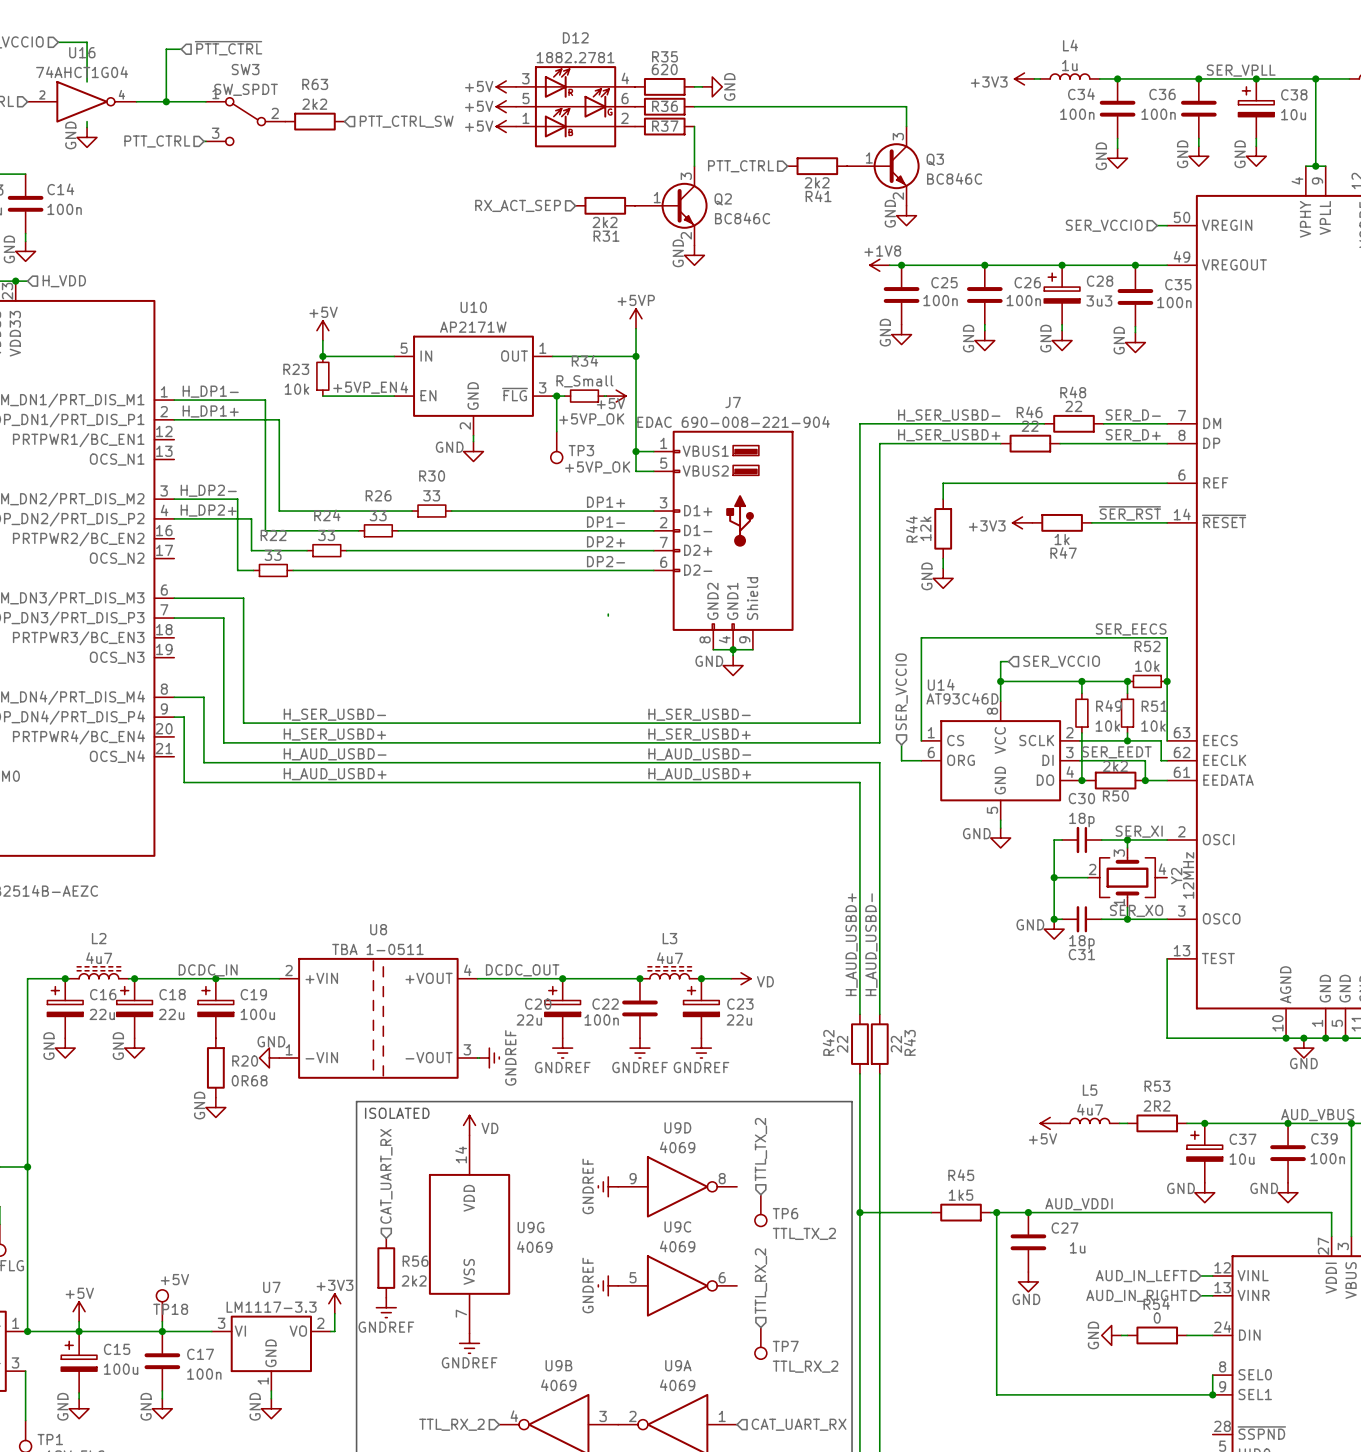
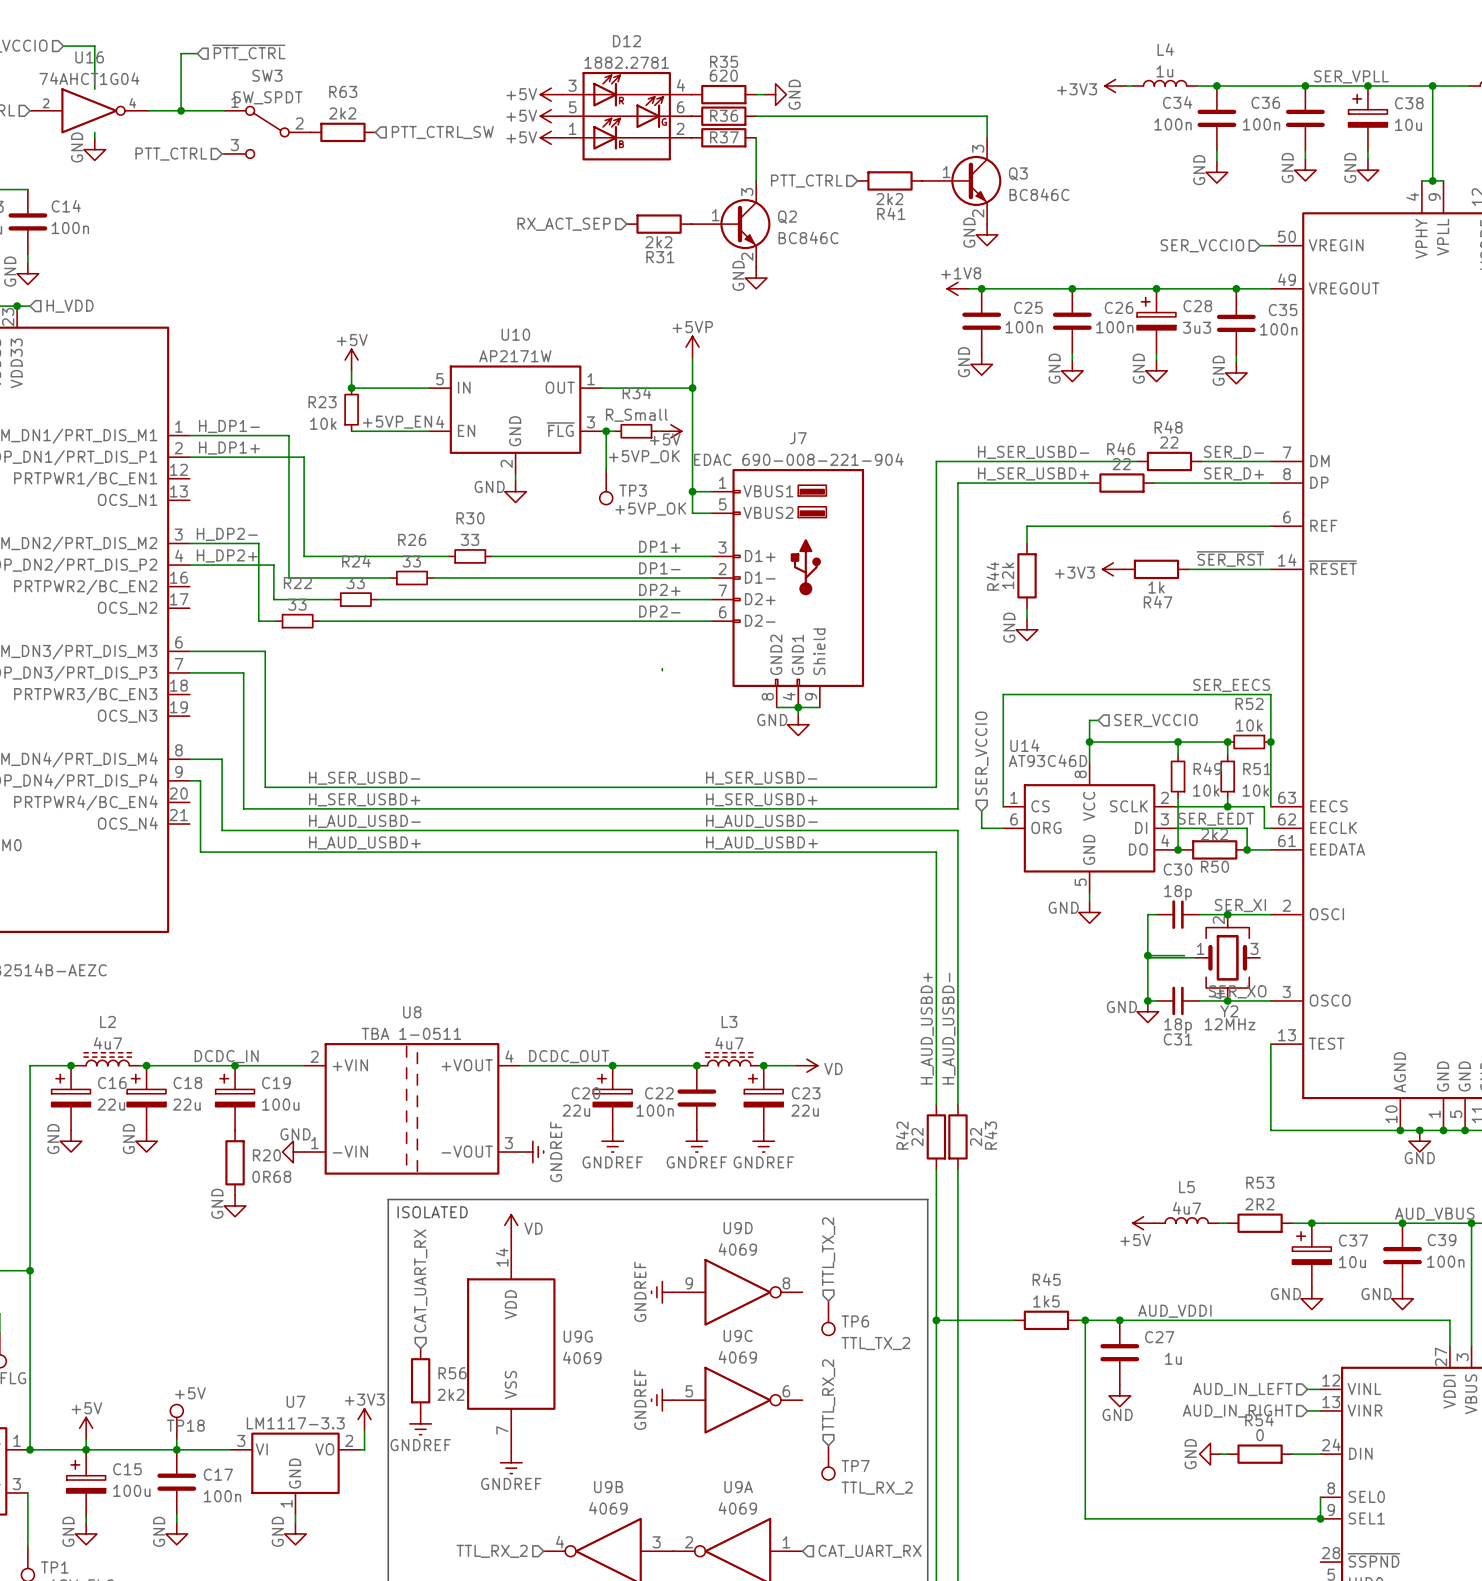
Y2 rotation: 0° (1127, 877) -> 90° clockwise (1227, 957)
wire: none -> (1147, 957) (1195, 957)

